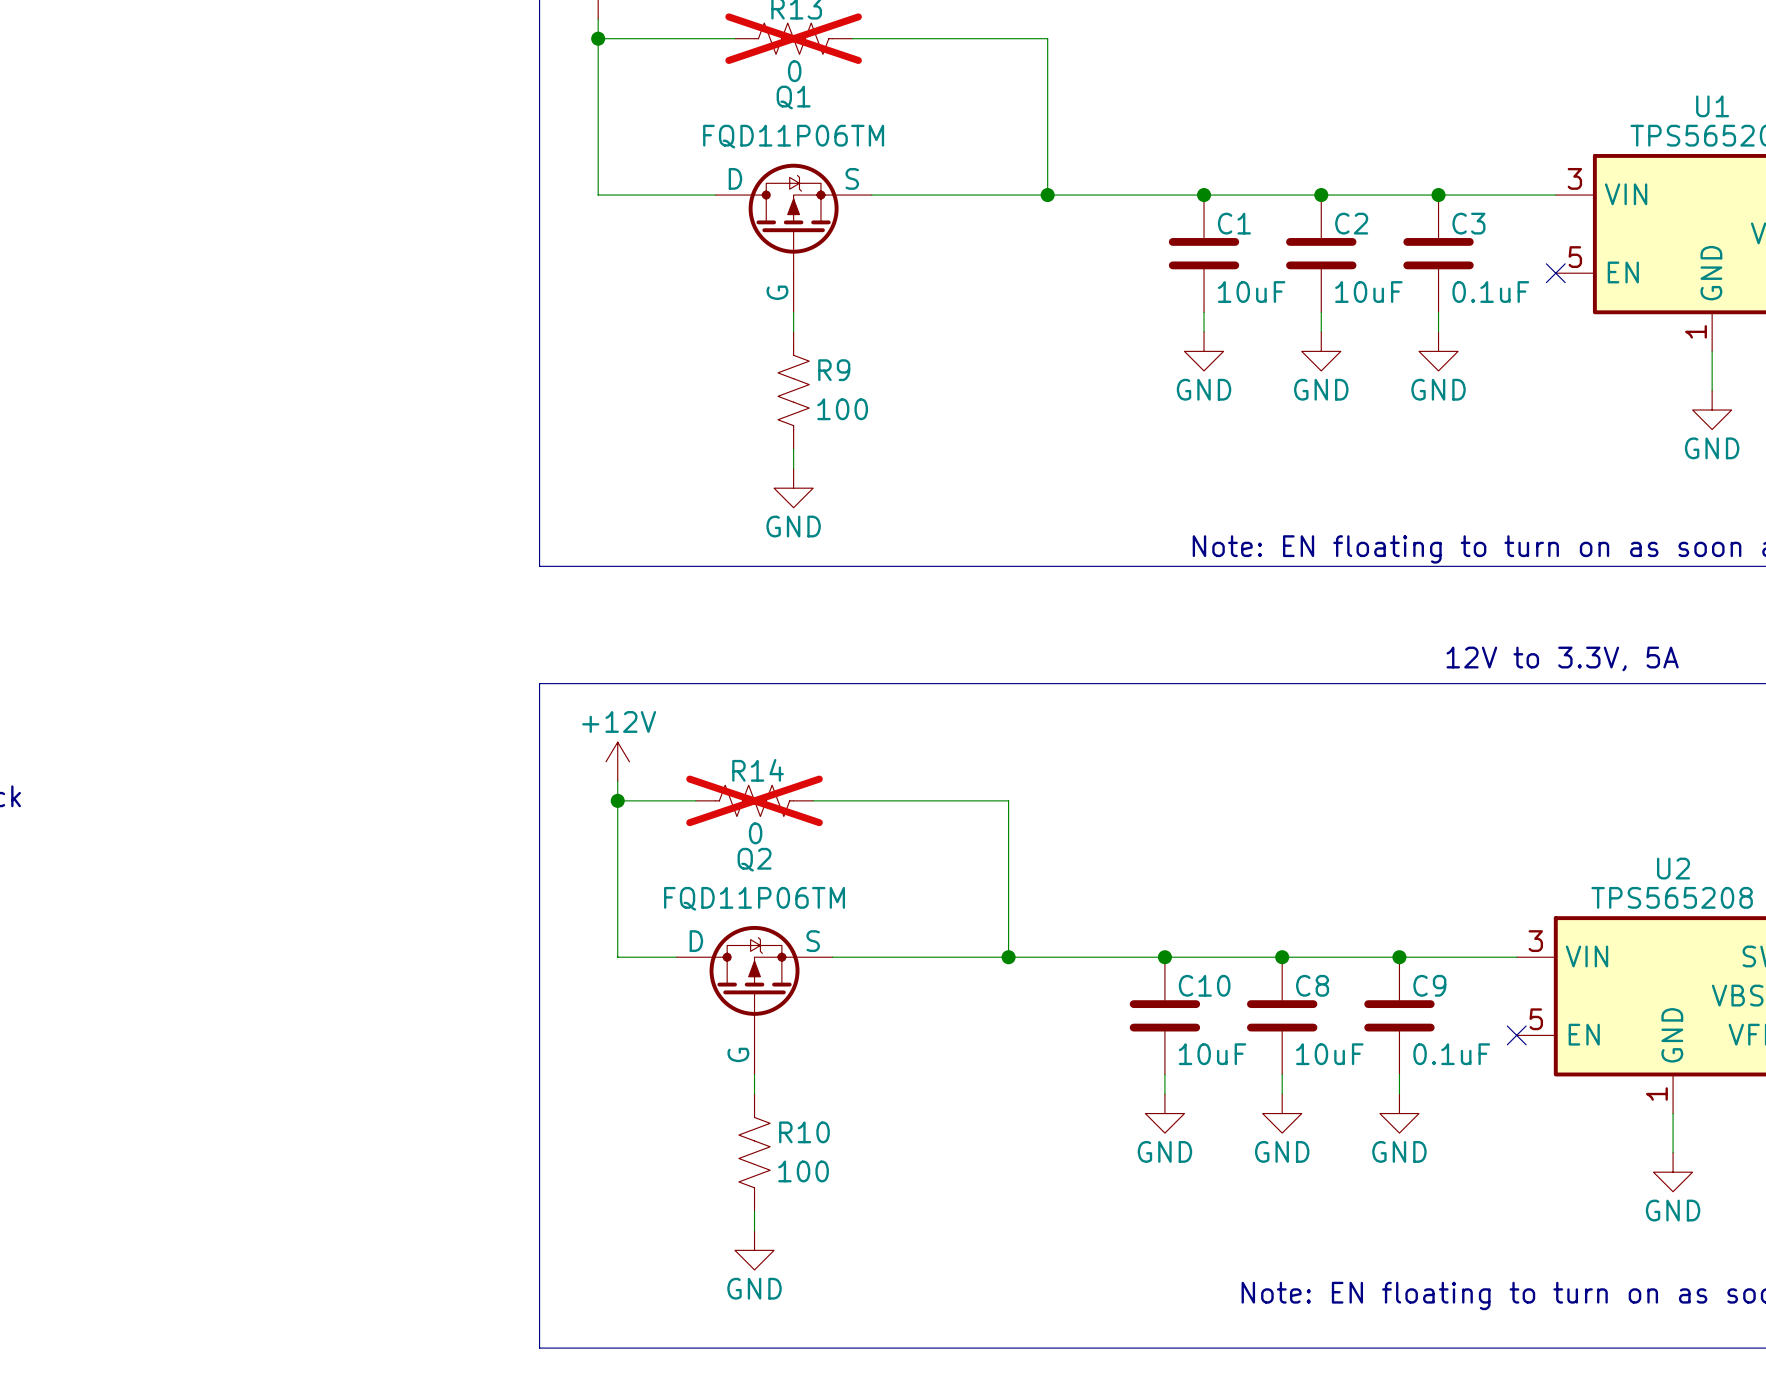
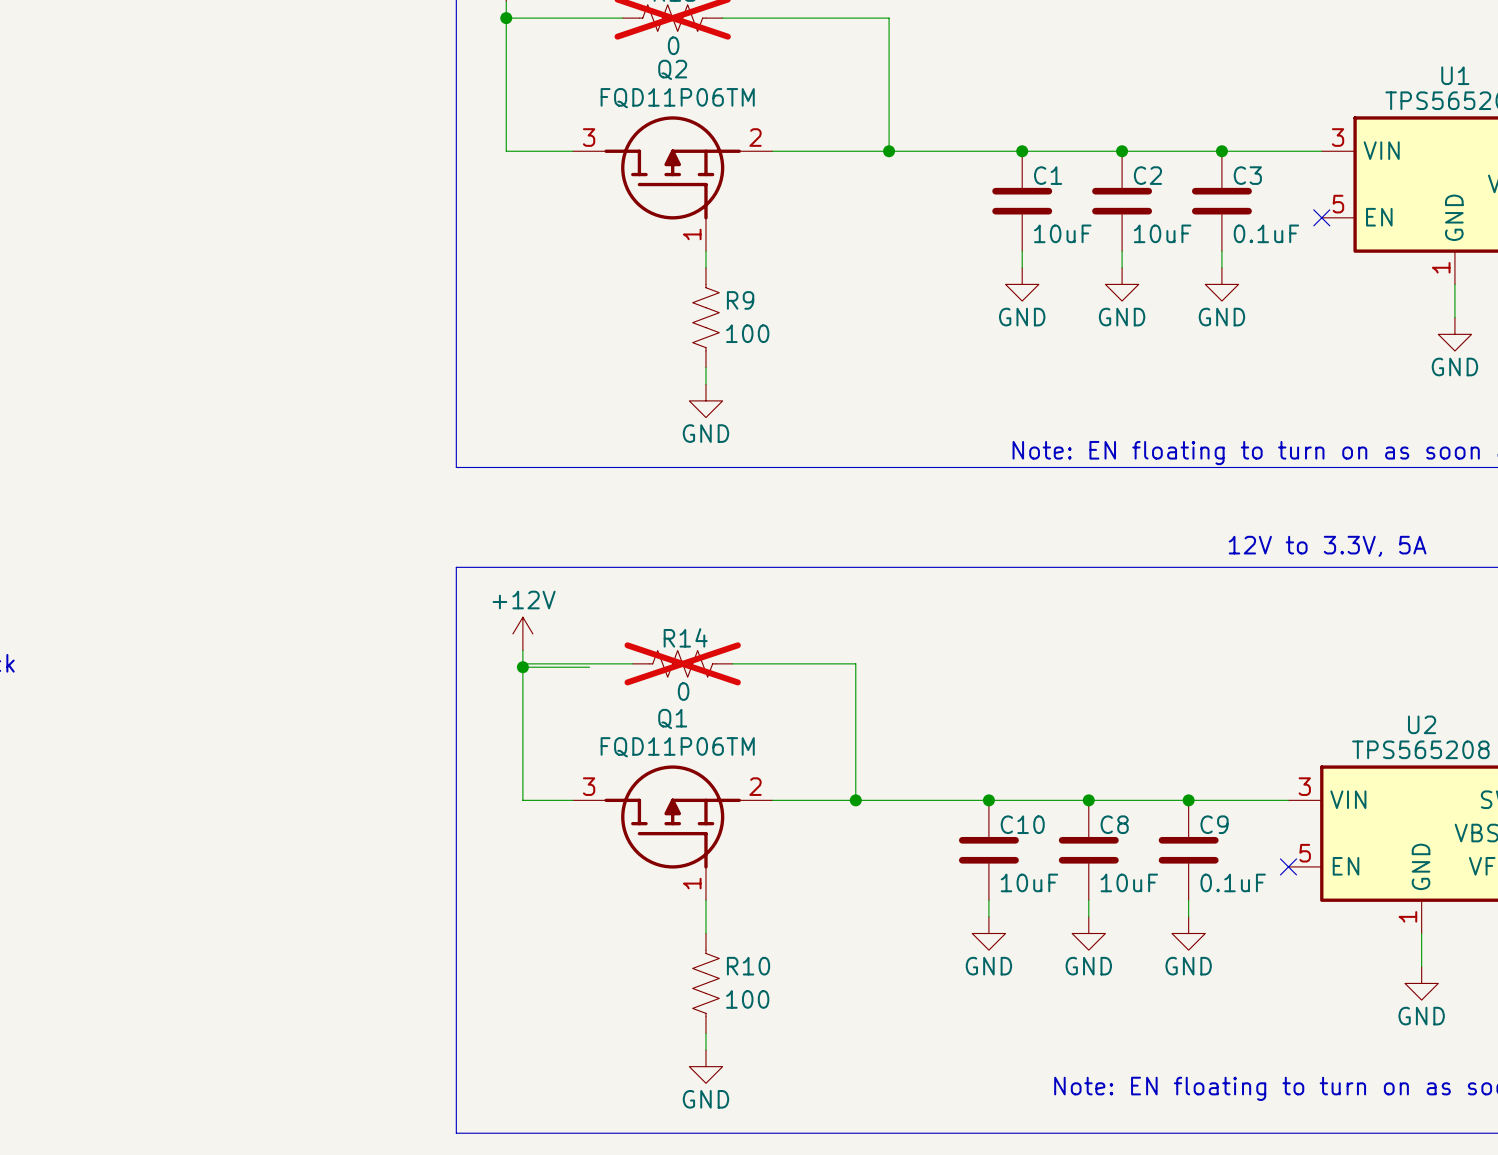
Q1 symbol: [715, 163, 872, 313] -> [572, 765, 773, 901]
wire: (793, 312) (793, 331) -> (705, 251) (705, 267)
R9 position: (793, 390) -> (705, 317)
wire: (793, 449) (793, 468) -> (705, 367) (705, 384)
power symbol position: GND (793, 488) -> GND (705, 400)
wire: none -> (522, 663) (632, 663)
R14 position: (754, 800) -> (682, 663)
wire: (813, 800) (1008, 800) -> (732, 663) (855, 663) (855, 667)
Q2 symbol: [676, 925, 833, 1075] -> [572, 116, 773, 252]
wire: (754, 1074) (754, 1094) -> none
wire: none -> (705, 900) (705, 933)
R10 position: (754, 1152) -> (705, 983)
wire: (754, 1211) (754, 1230) -> (705, 1033) (705, 1050)
power symbol position: GND (754, 1250) -> GND (705, 1066)

